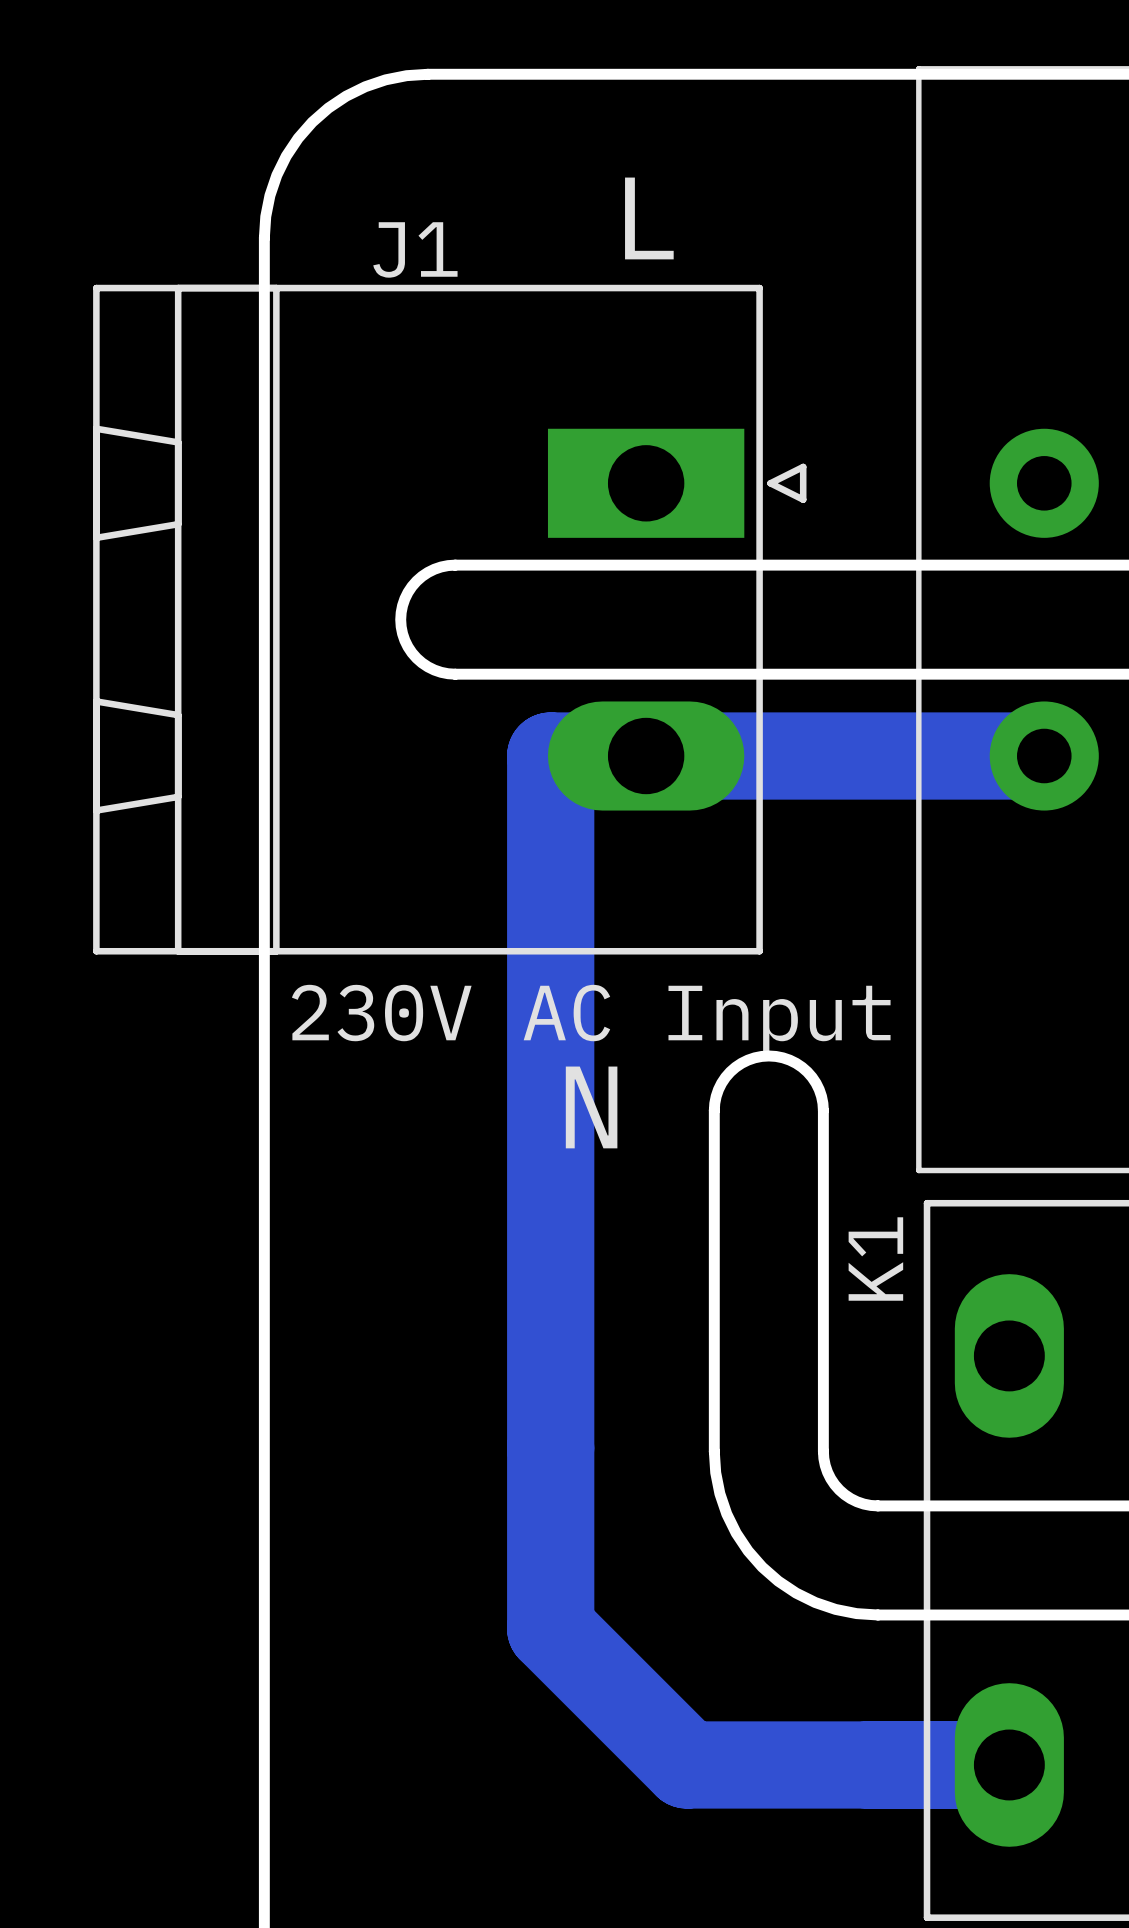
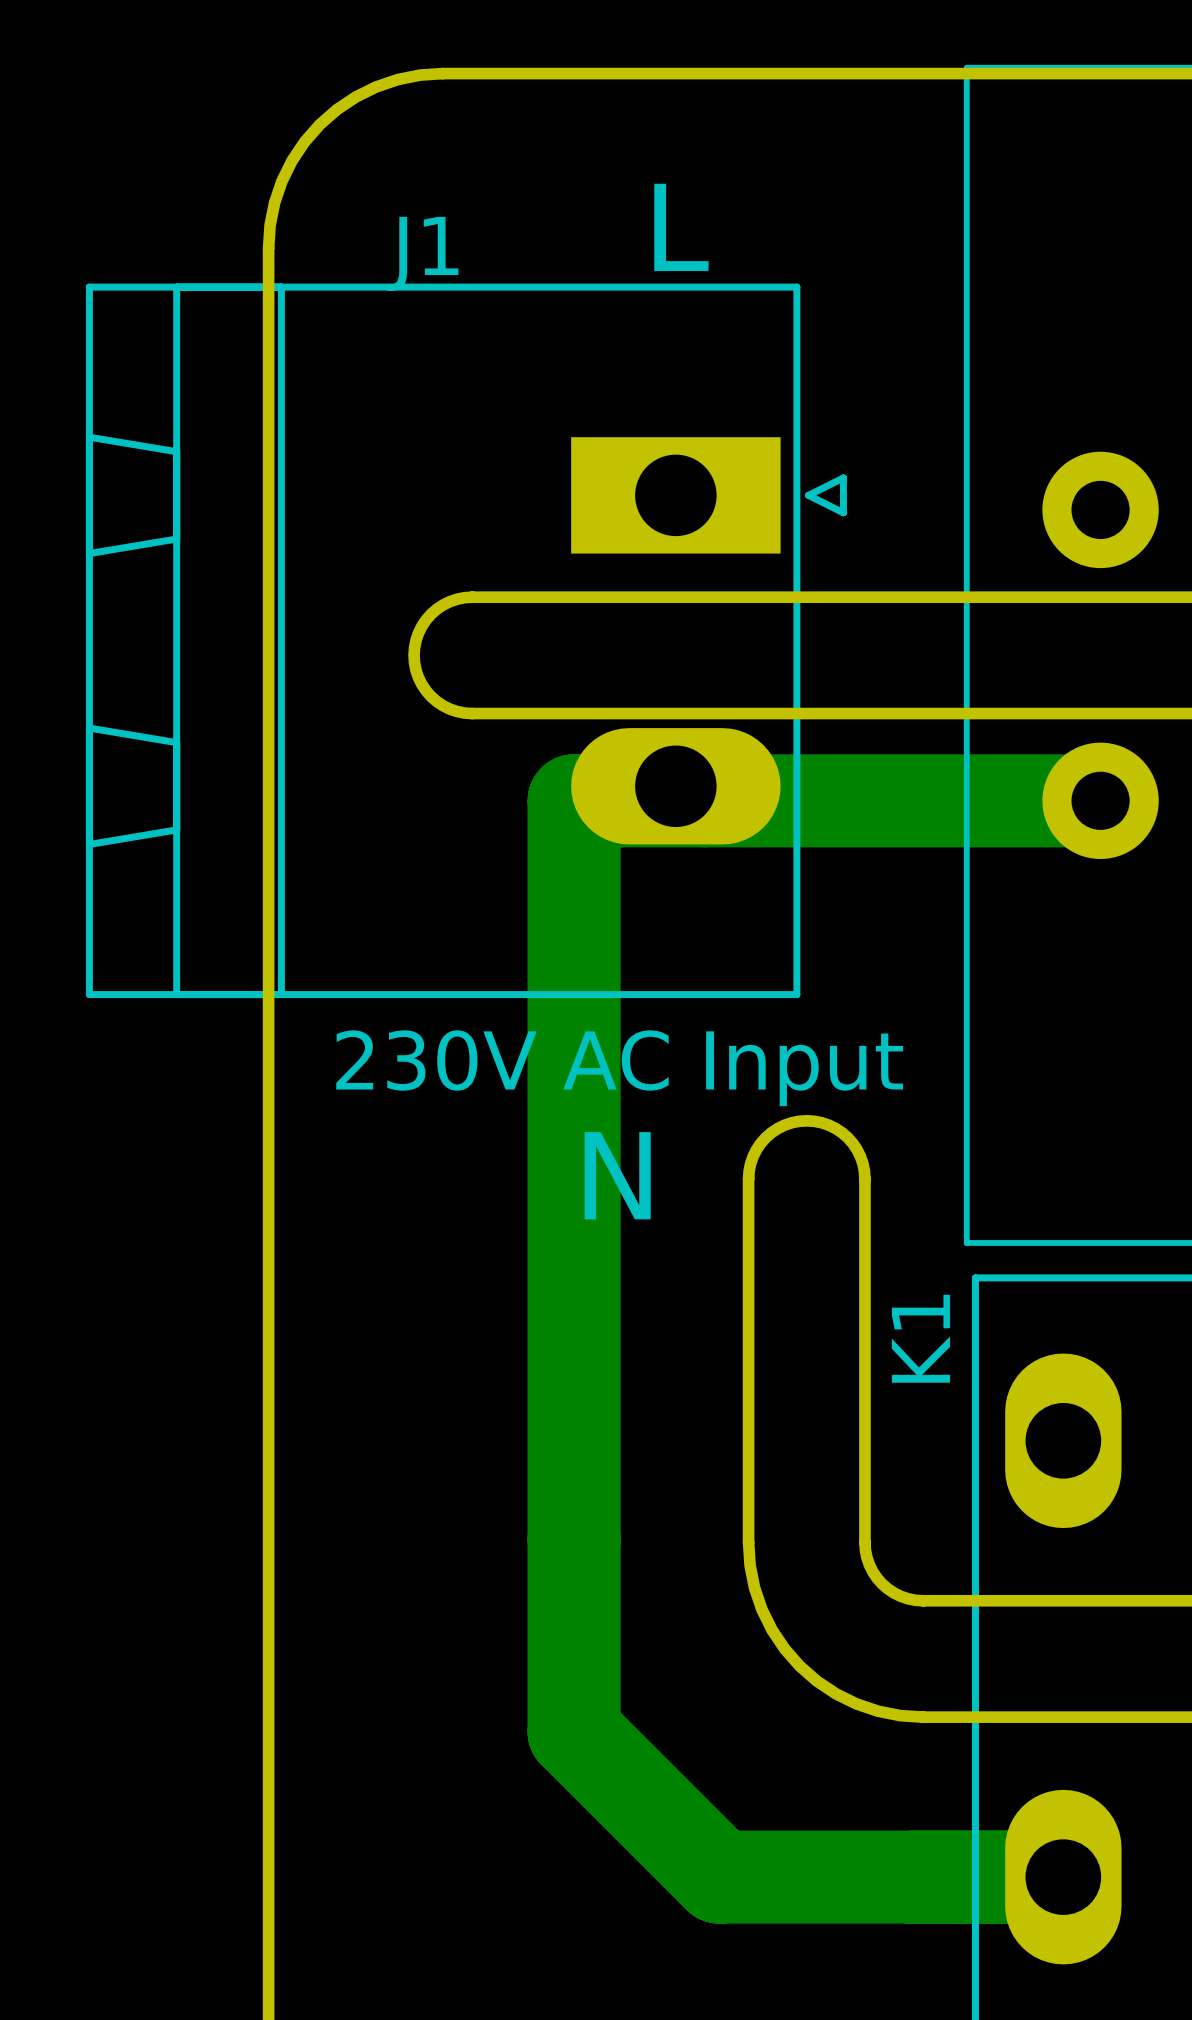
J1 position: (449, 619) -> (466, 640)

